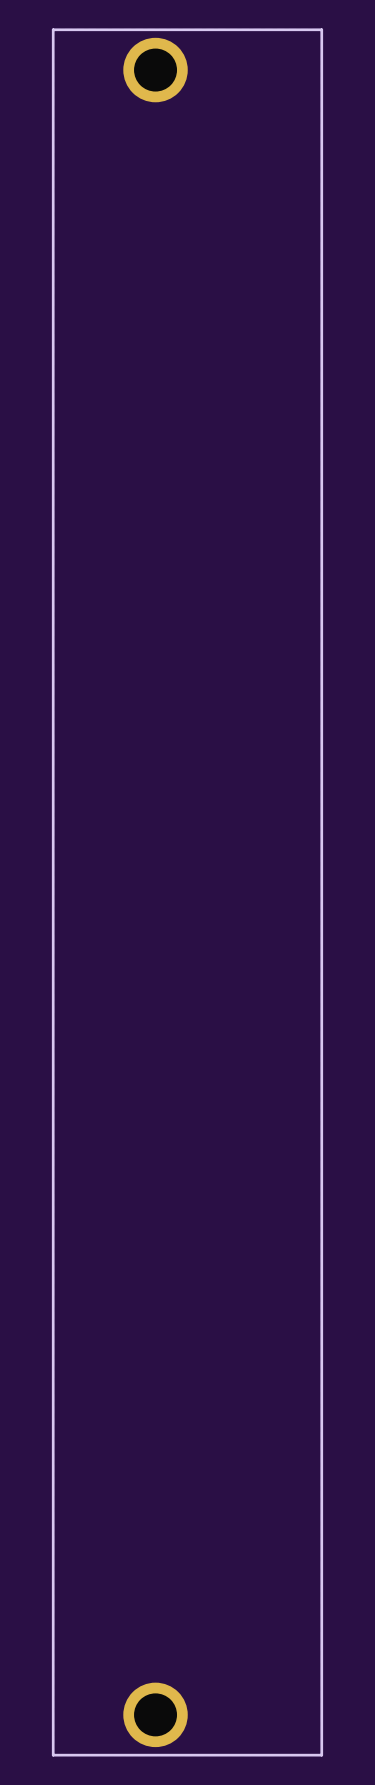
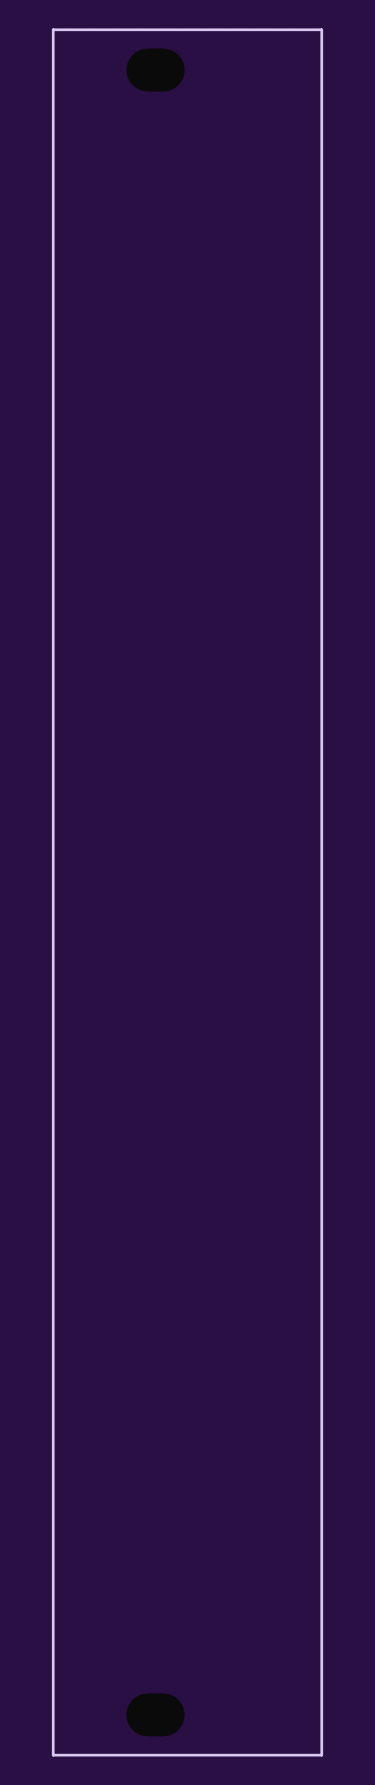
part footprint: [123, 37, 188, 103] -> [126, 48, 185, 92]
part footprint: [123, 1682, 188, 1748] -> [126, 1693, 185, 1737]

